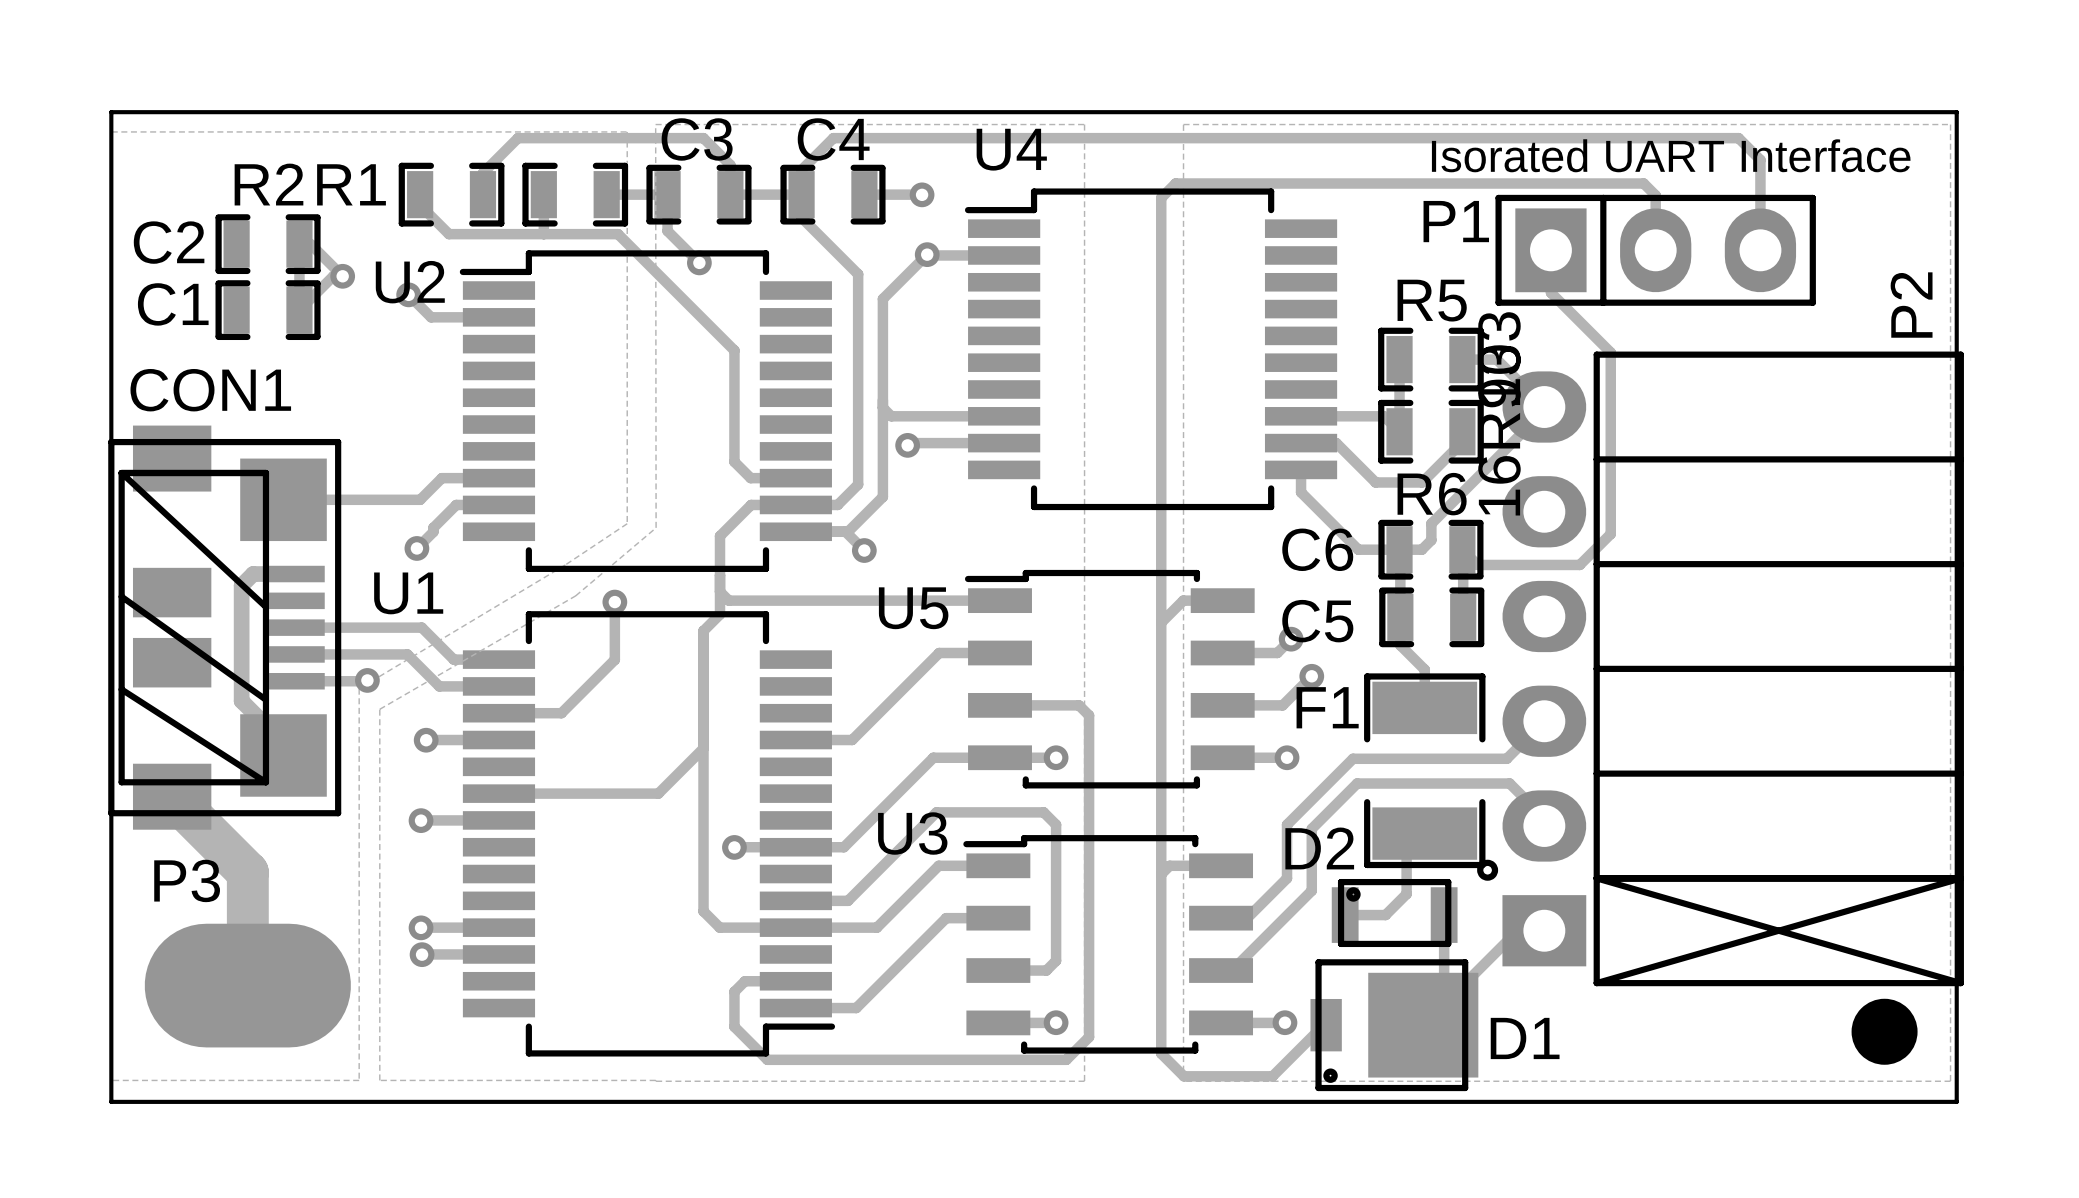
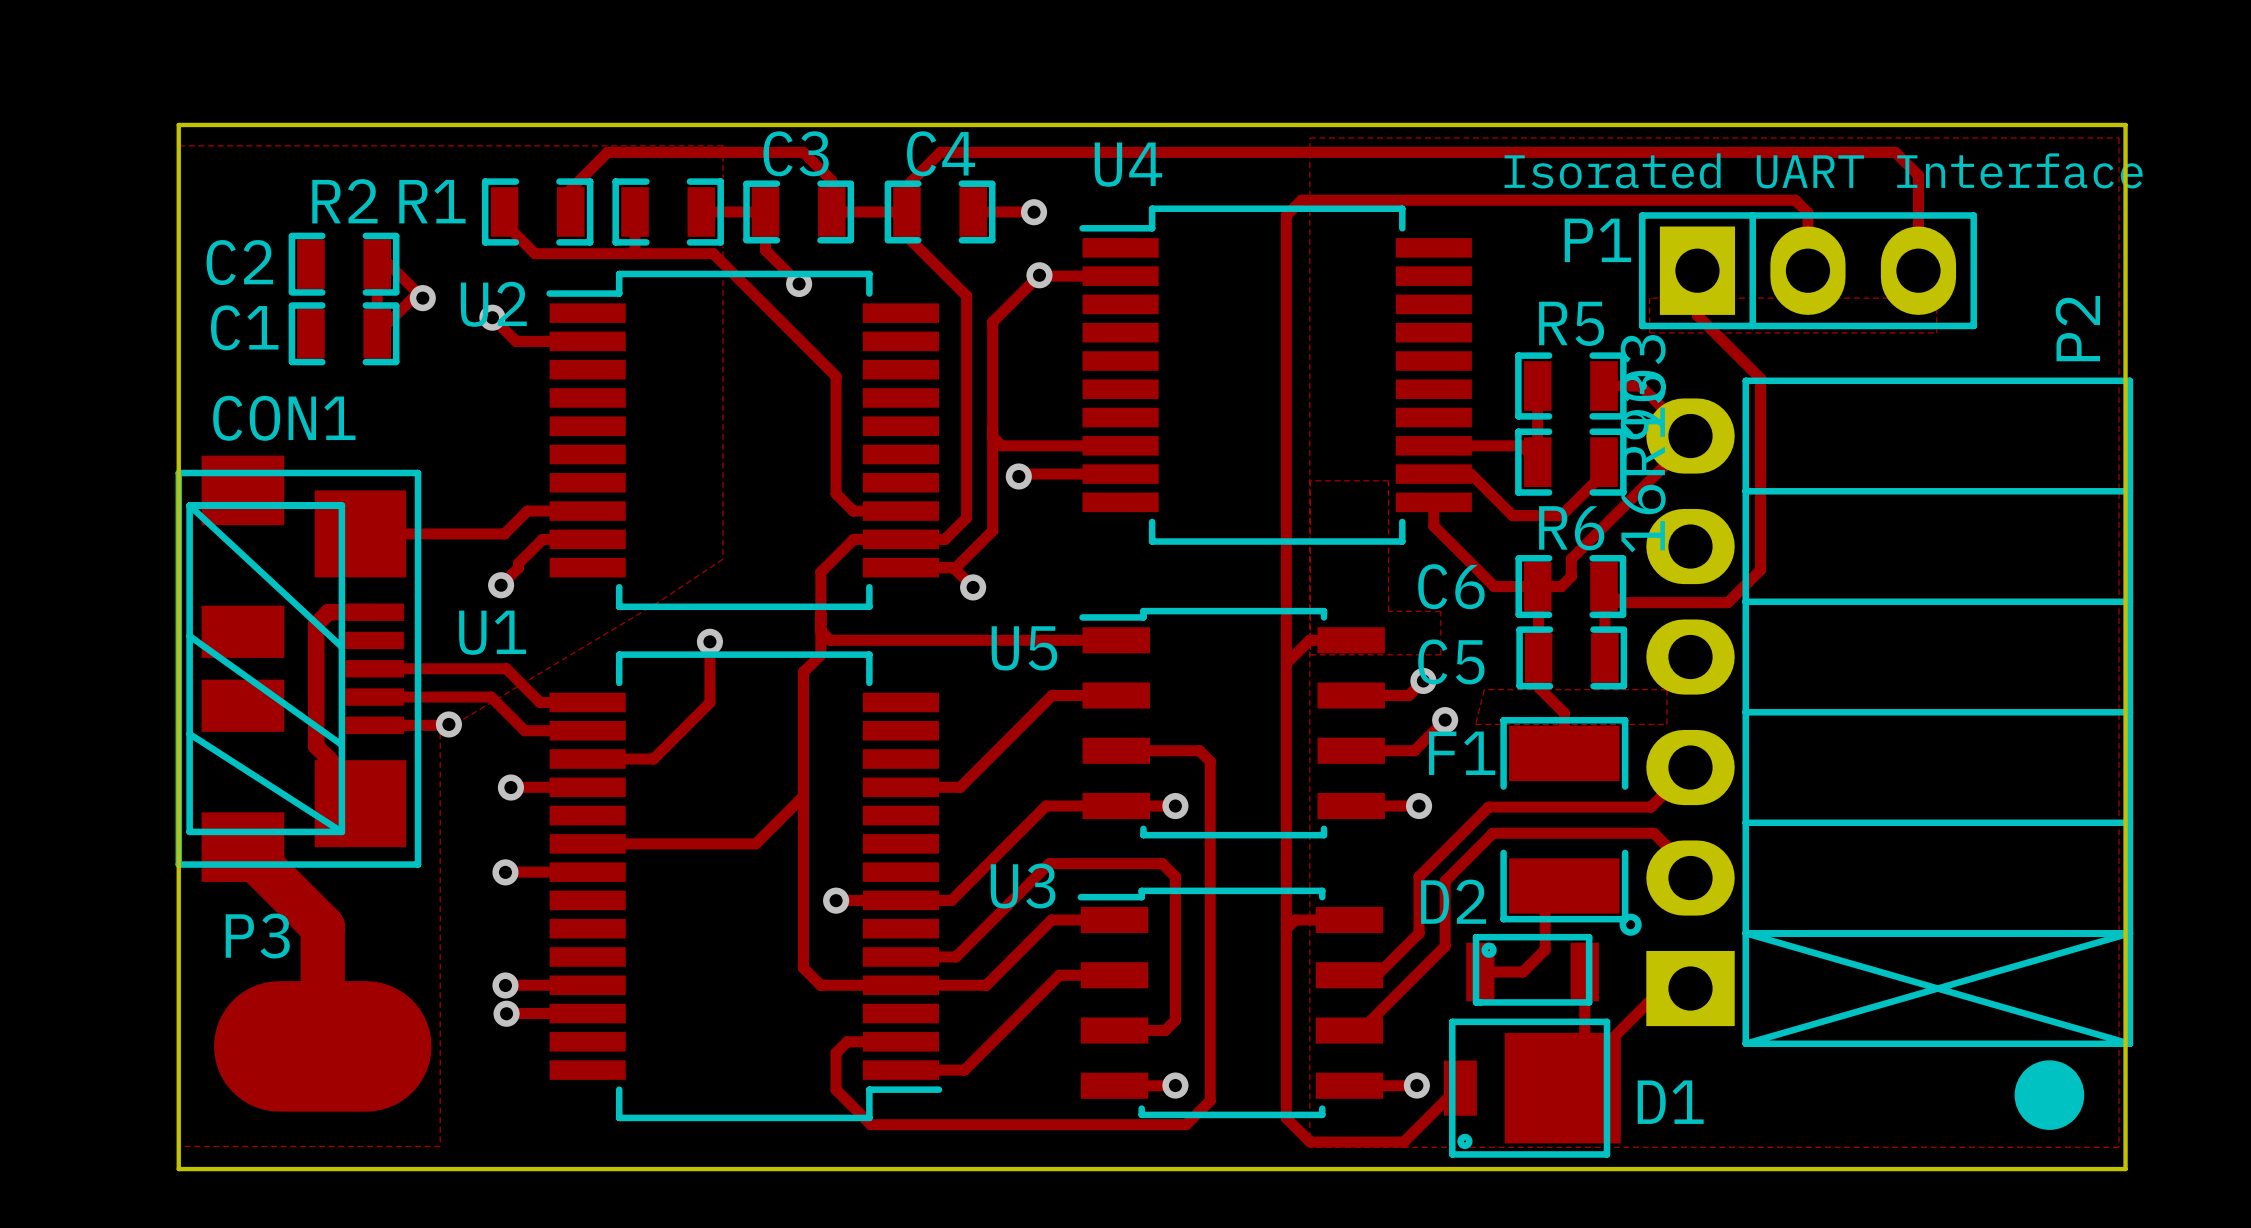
zone outline: none -> (1649, 298) (1936, 298) (1936, 332) (1649, 332) (1649, 298)
zone outline: none -> (1310, 480) (1388, 480) (1388, 611) (1440, 611) (1440, 654) (1310, 654) (1310, 480)
zone outline: none -> (1484, 689) (1667, 689) (1667, 724) (1475, 724) (1484, 689)
zone outline: (655, 1080) (379, 1080) (379, 709) (575, 595) (656, 527) (655, 124) (1084, 124) (1084, 1081) (655, 1081) -> none

